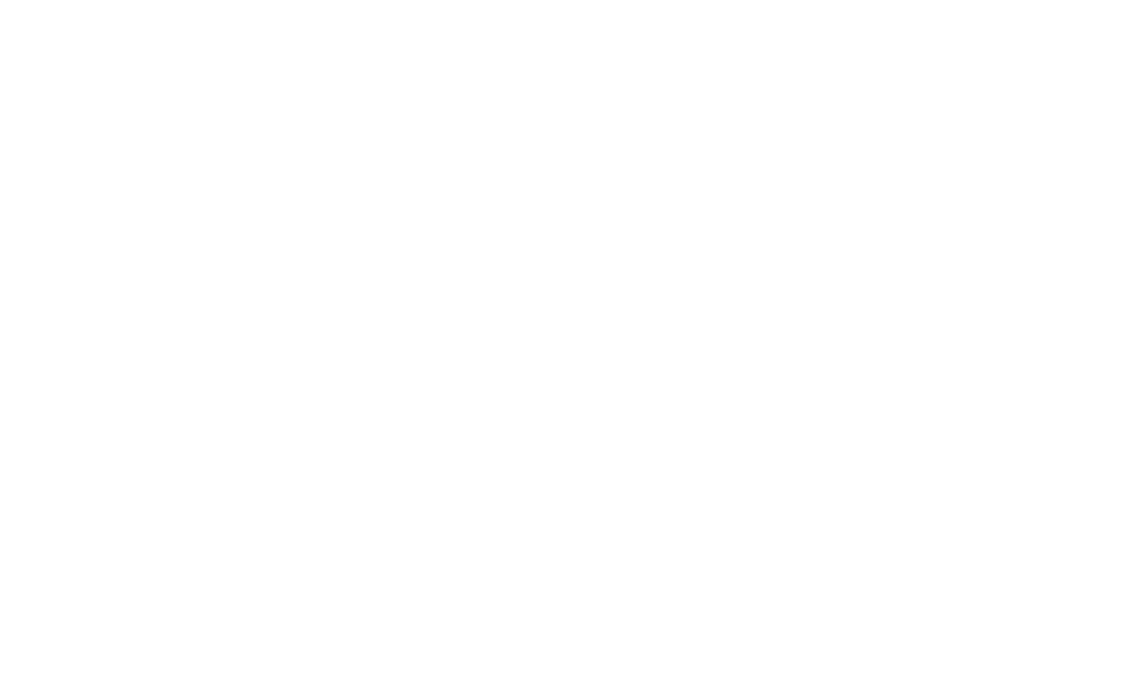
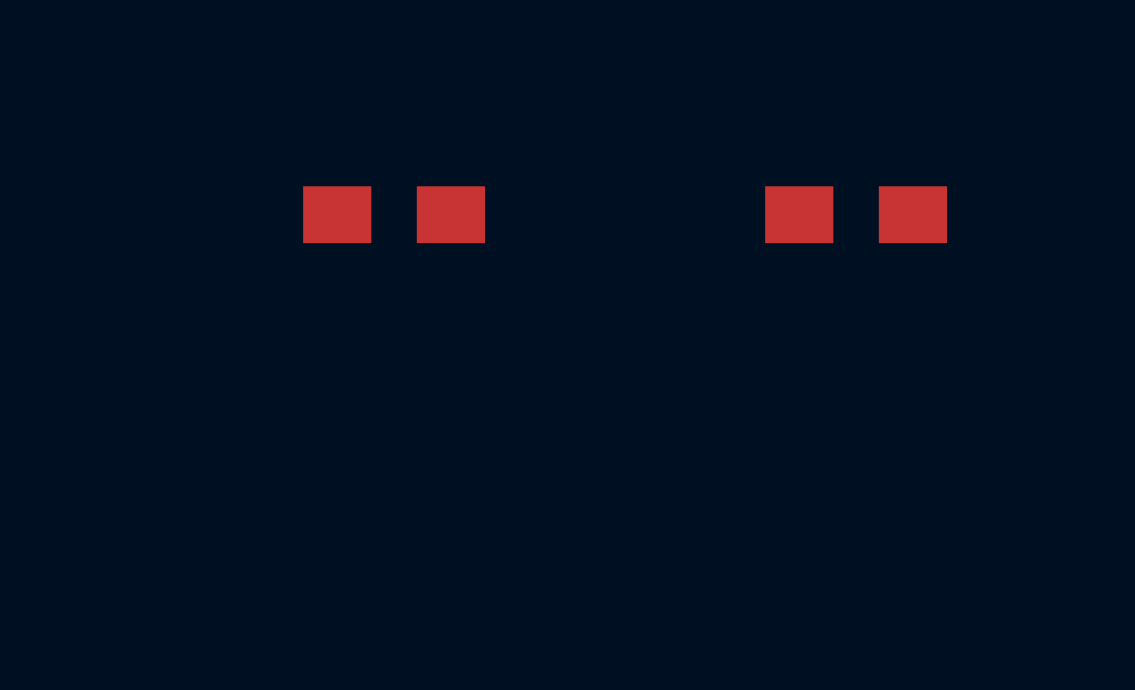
part: none -> (394, 214)
part: none -> (856, 214)

